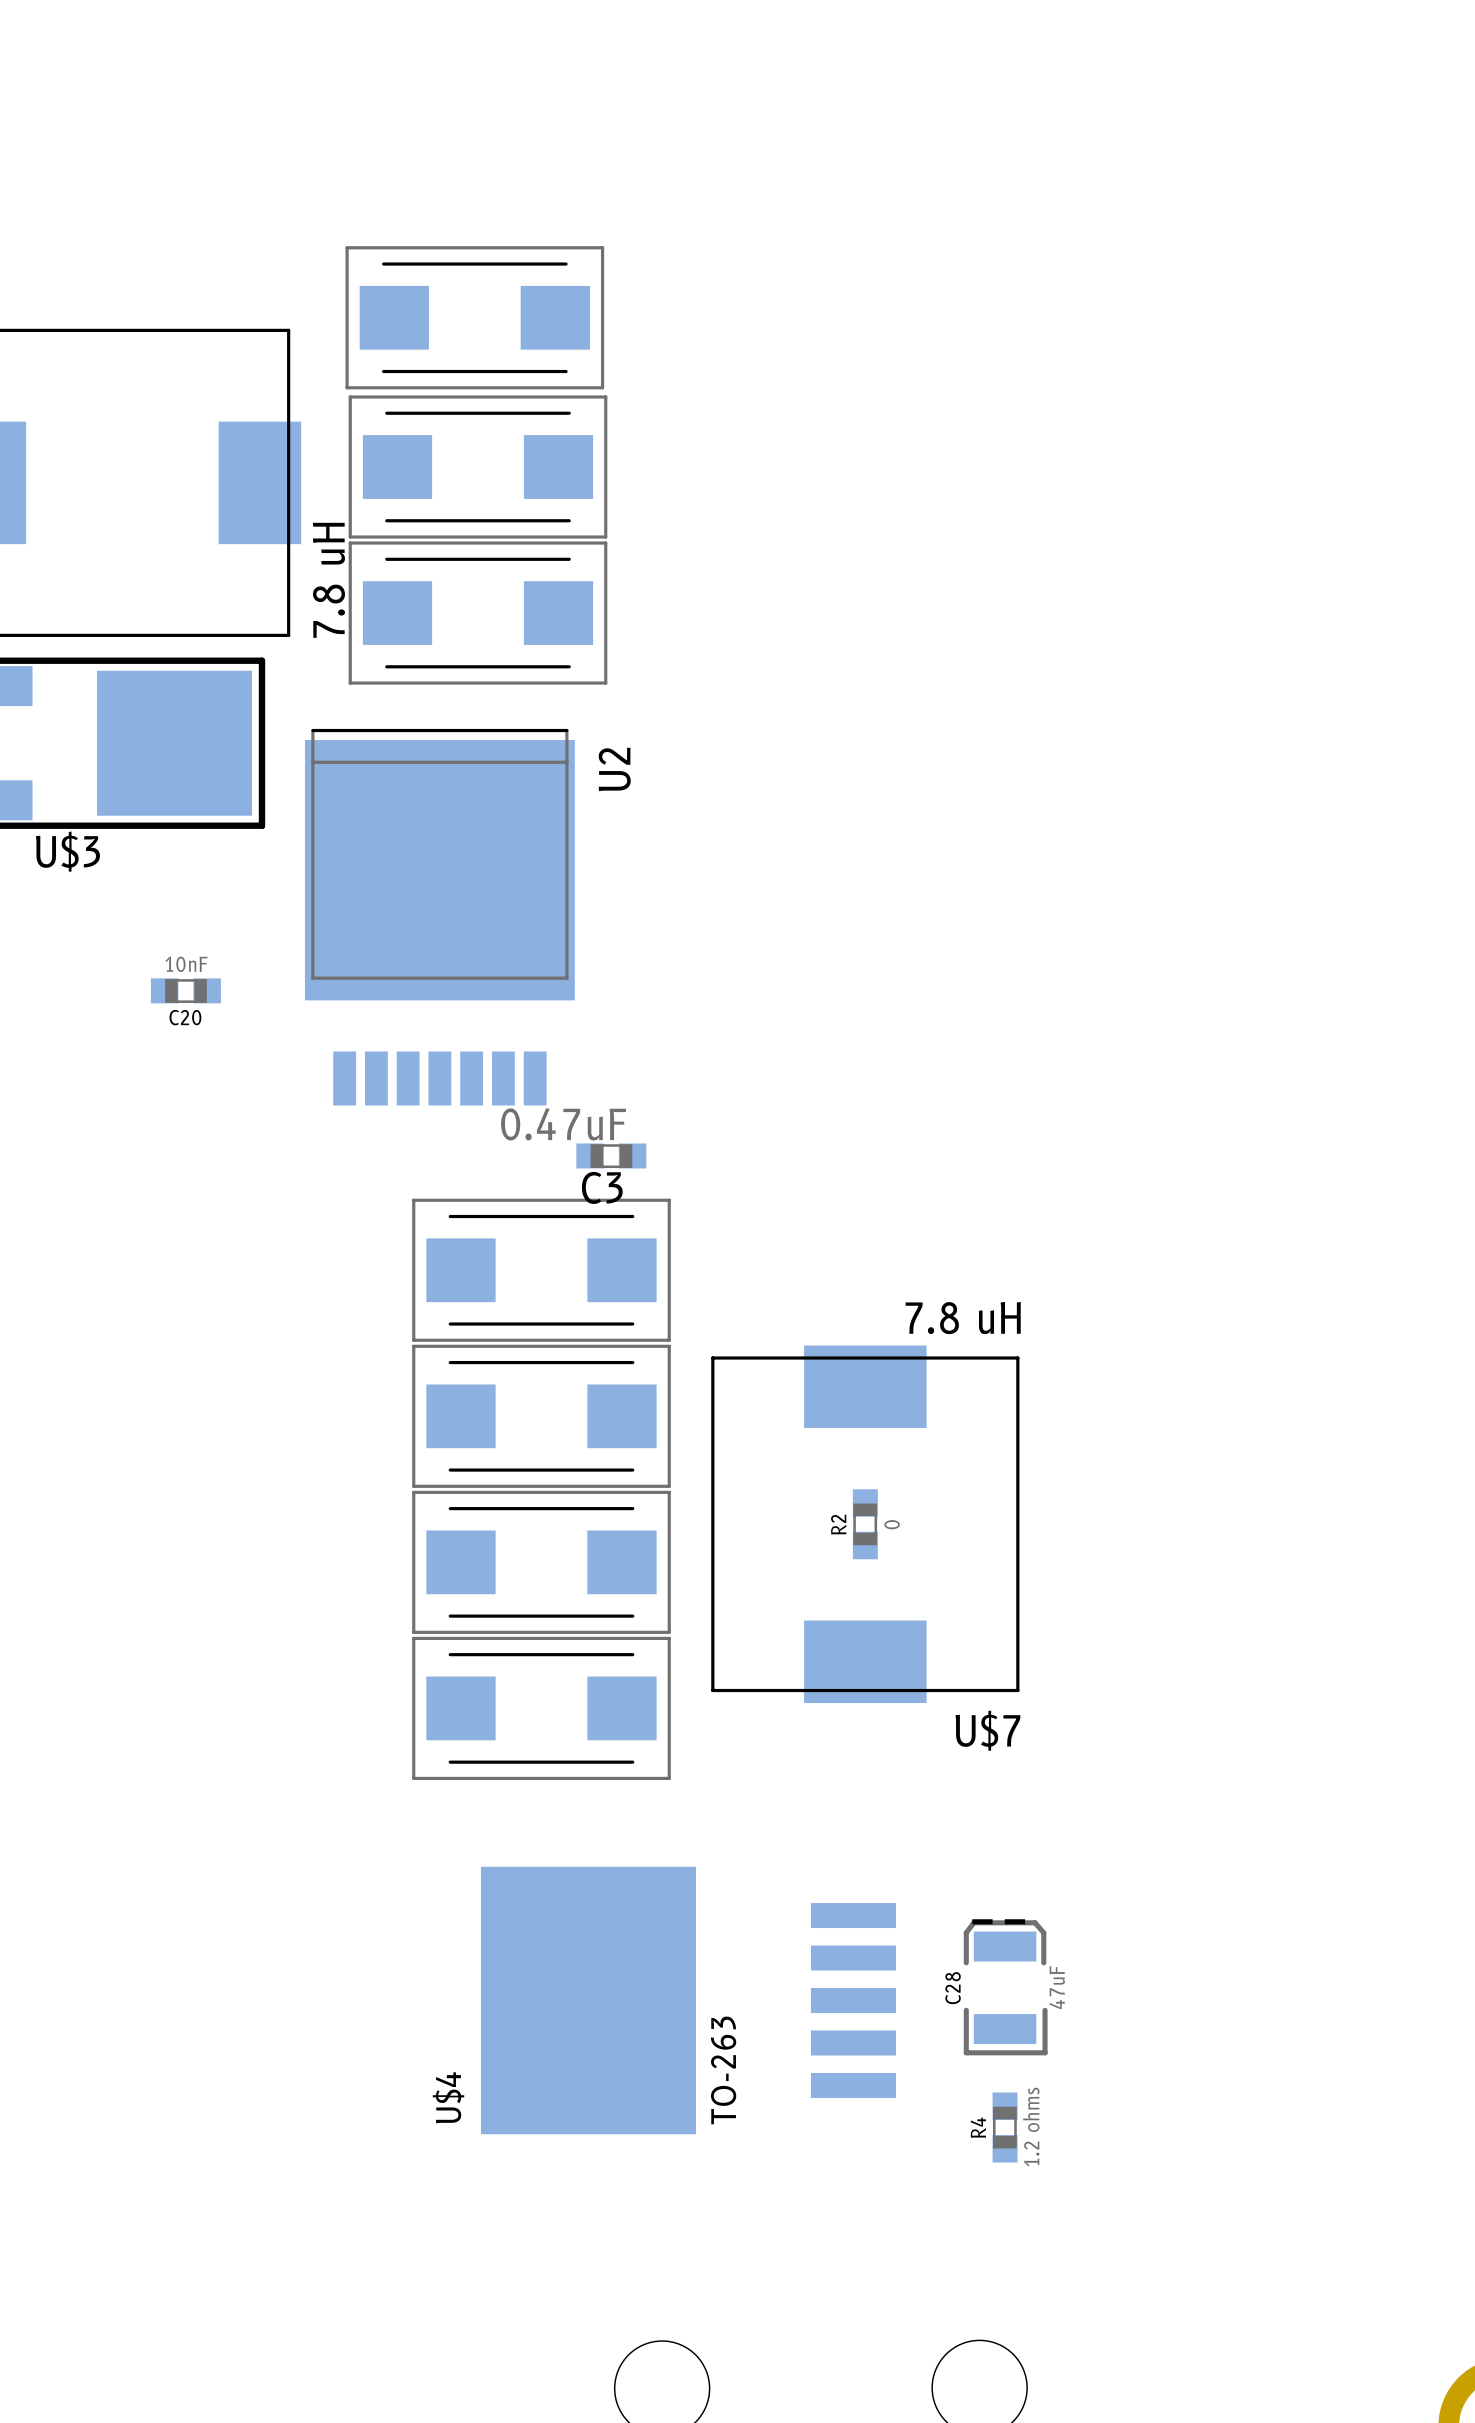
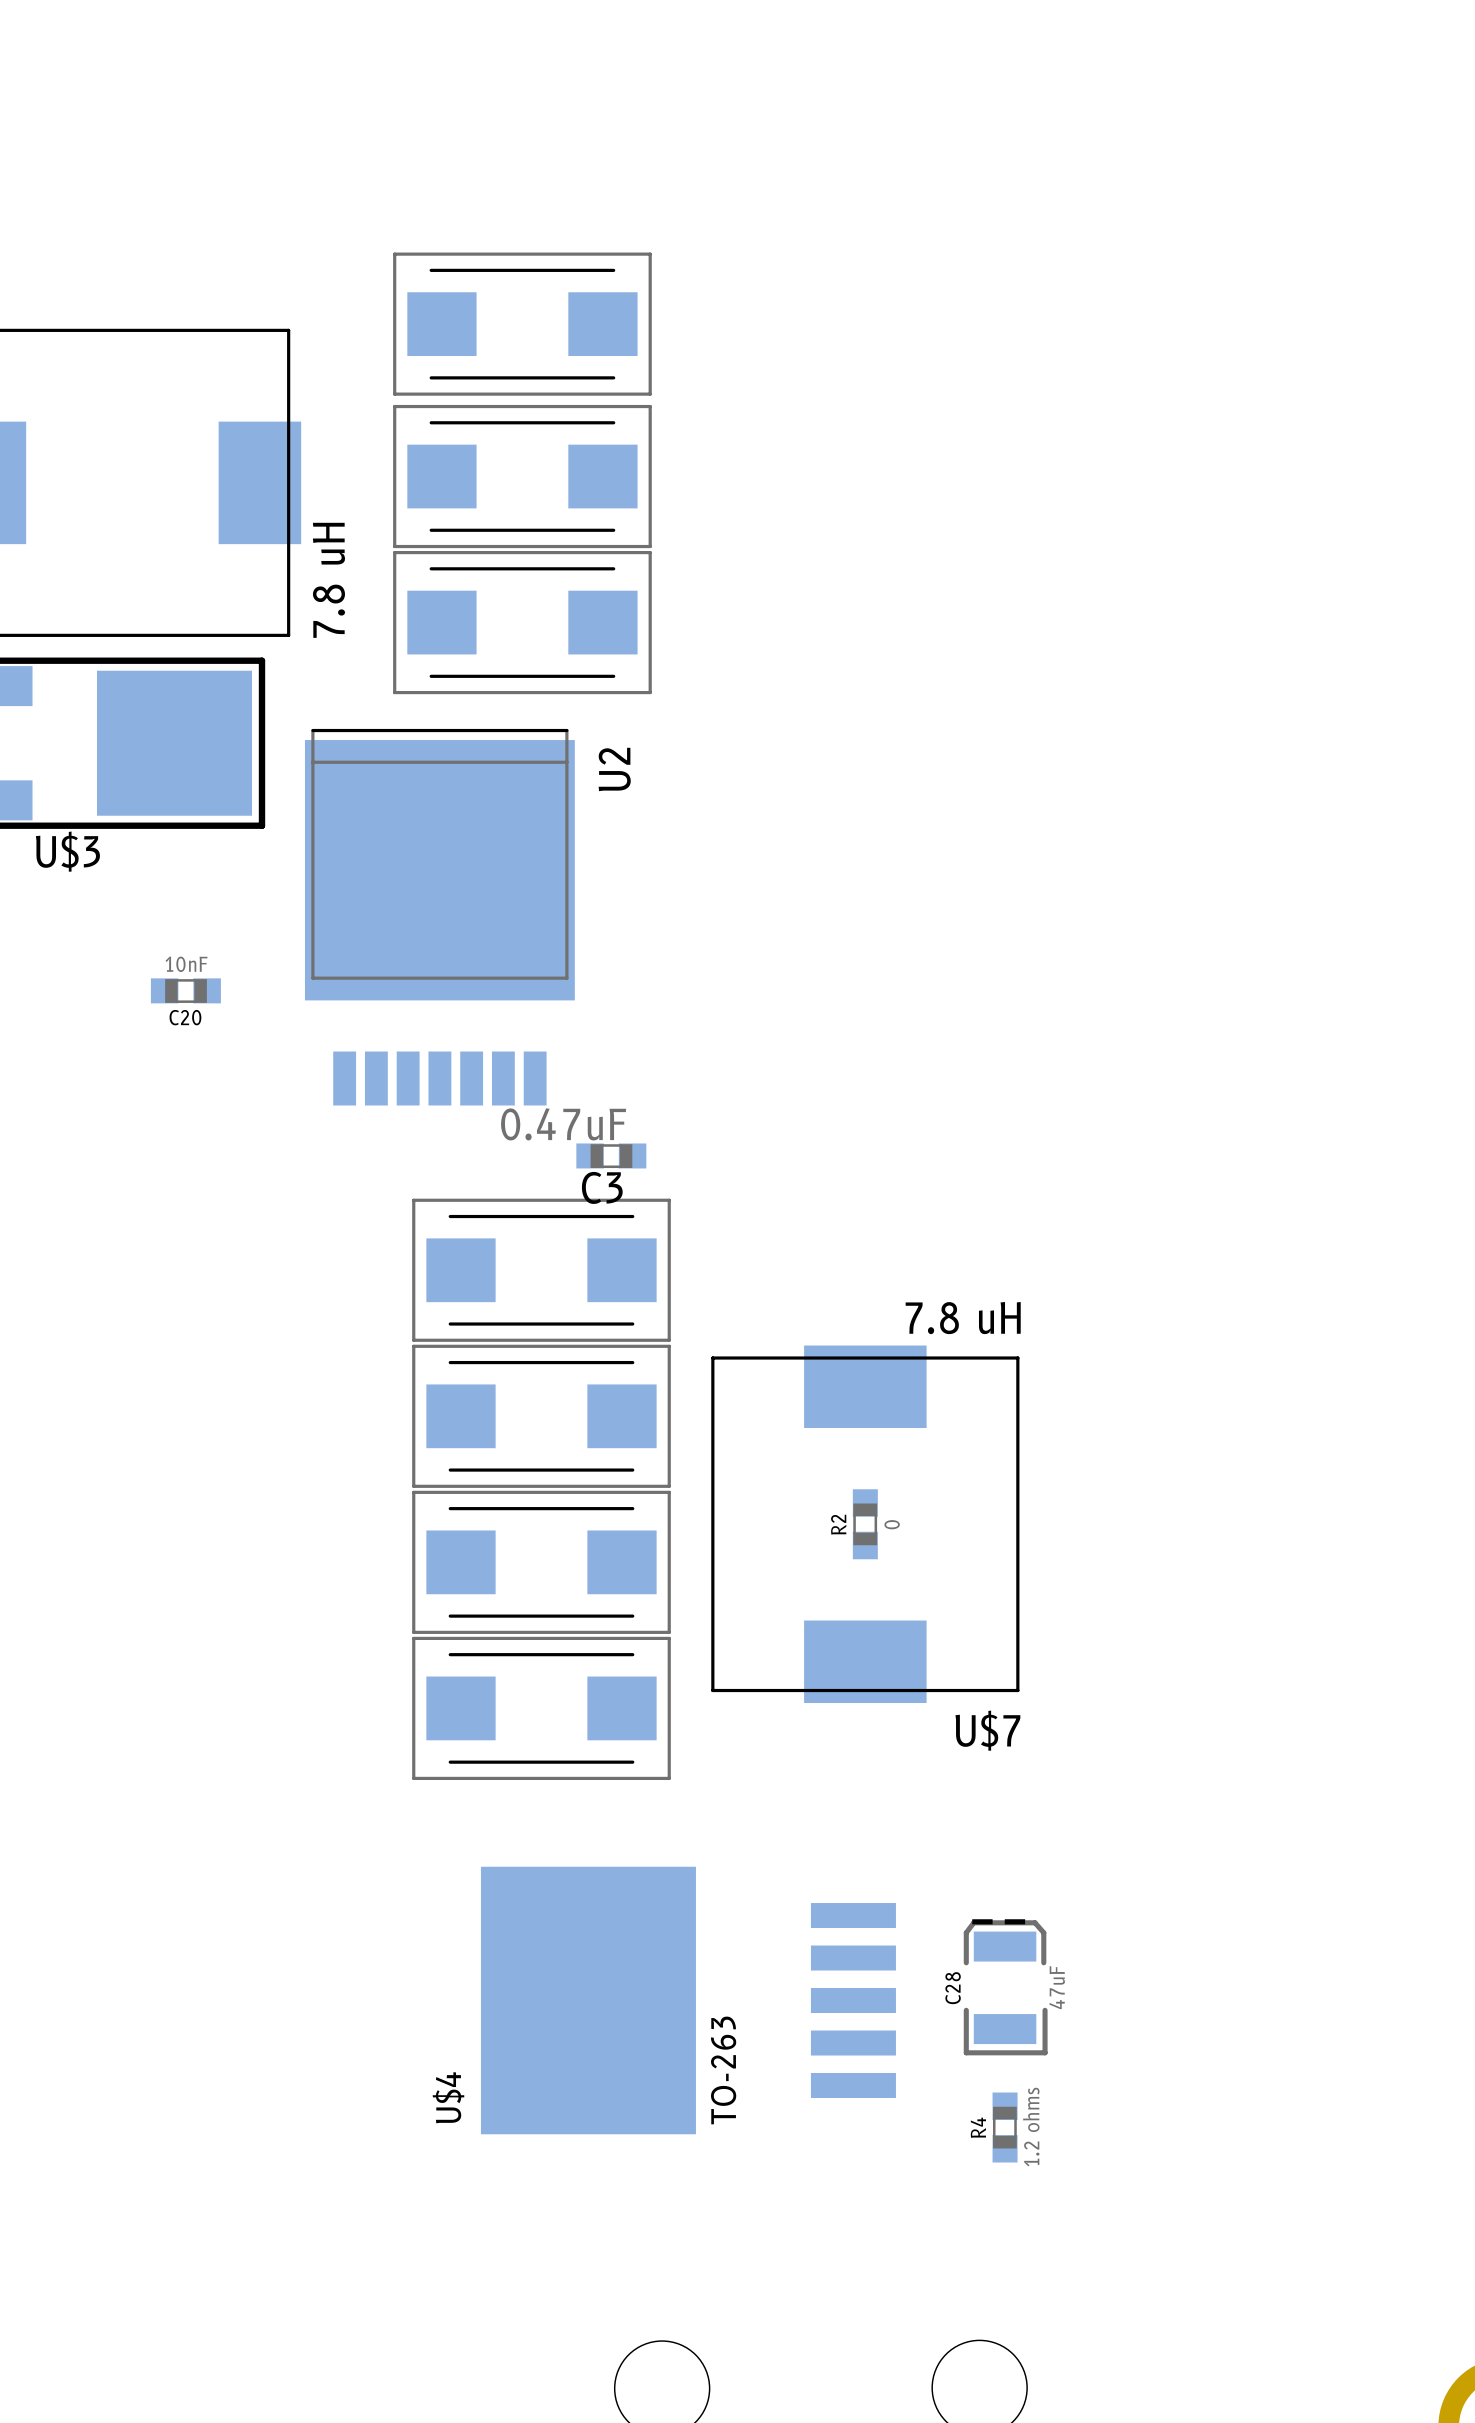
part position: (474, 317) -> (522, 324)
part position: (478, 467) -> (522, 476)
part position: (478, 613) -> (522, 622)

